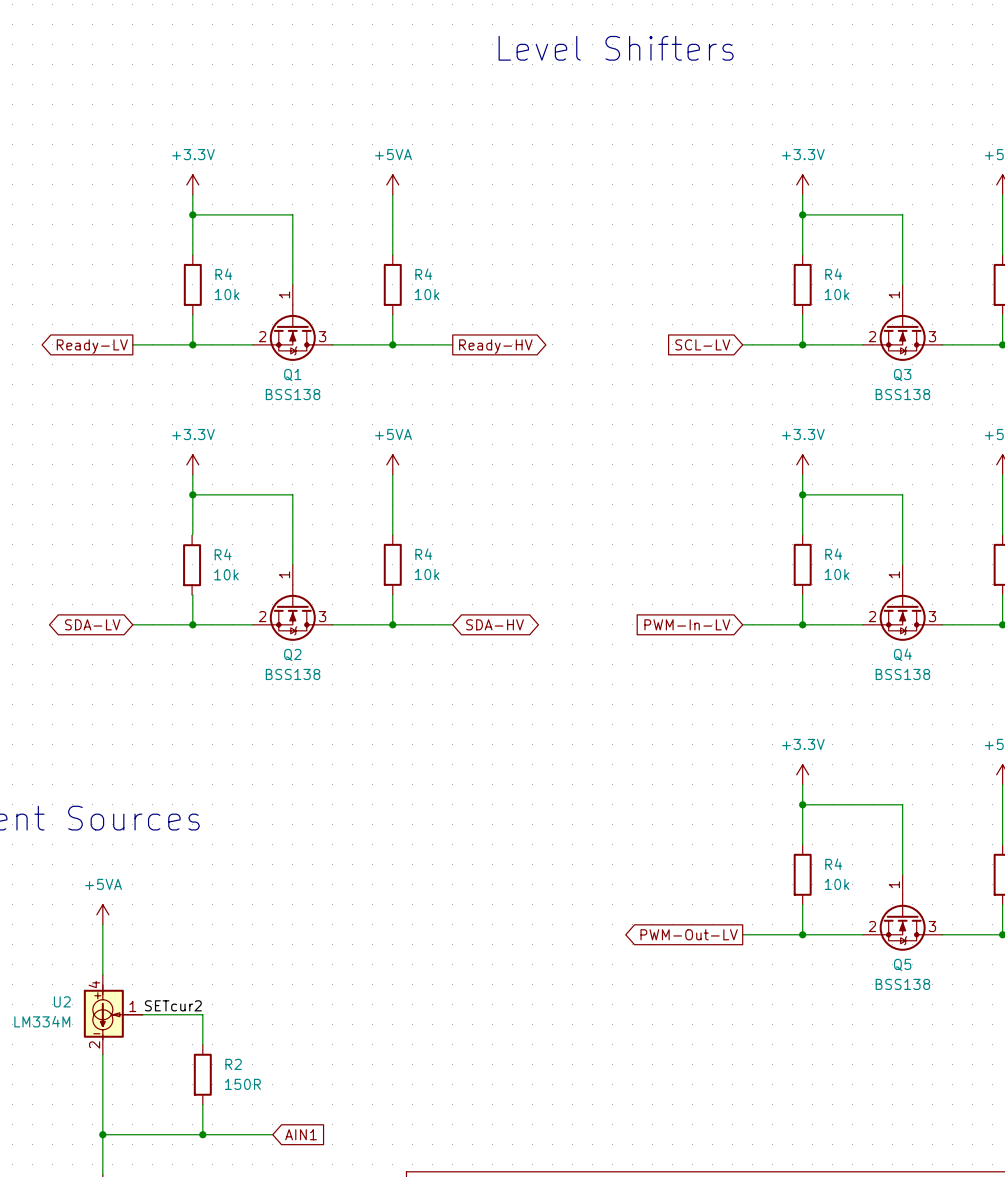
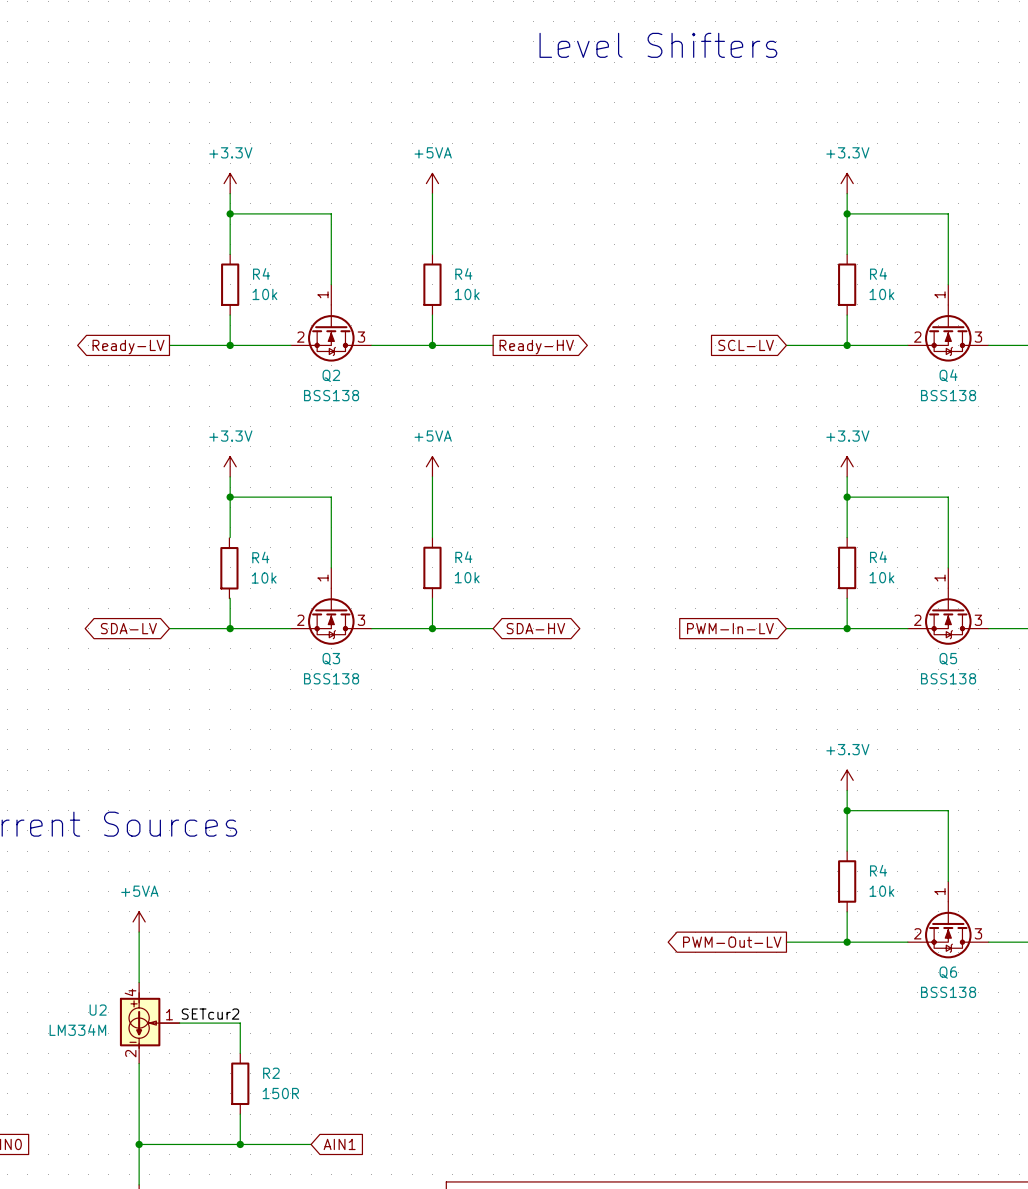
Q1 name: Q1 (292, 375) -> Q2 (331, 375)
Q3 name: Q3 (902, 375) -> Q4 (948, 375)
Q2 name: Q2 (292, 654) -> Q3 (331, 659)
Q4 name: Q4 (902, 654) -> Q5 (948, 659)
Q5 name: Q5 (902, 964) -> Q6 (948, 972)

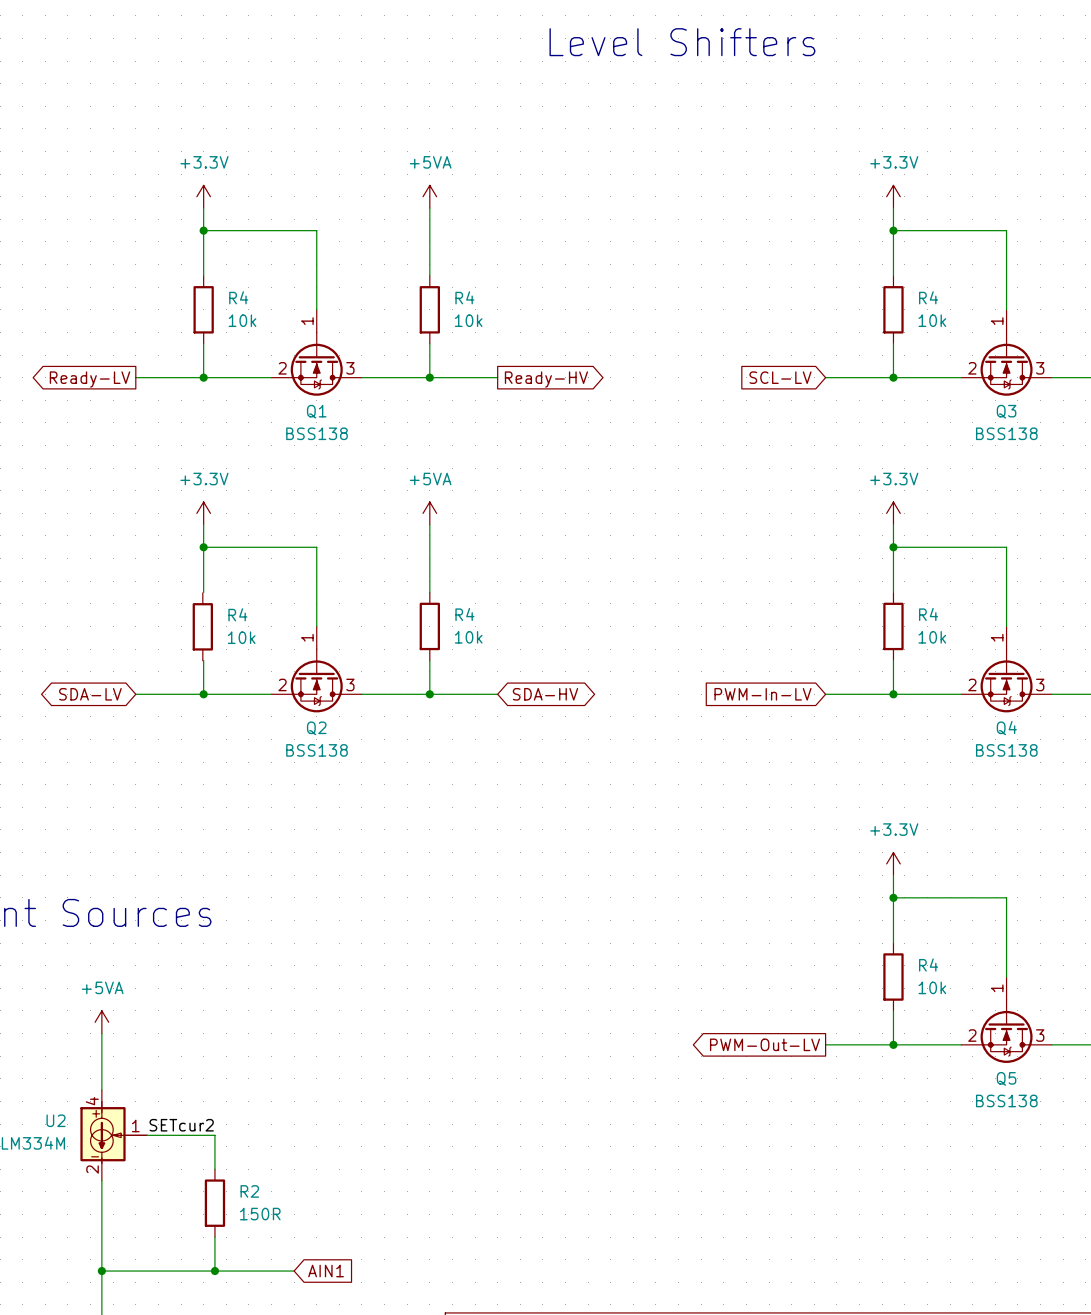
Q2 name: Q2 (331, 375) -> Q1 (316, 411)
Q4 name: Q4 (948, 375) -> Q3 (1006, 411)
Q3 name: Q3 (331, 659) -> Q2 (316, 728)
Q5 name: Q5 (948, 659) -> Q4 (1006, 728)
Q6 name: Q6 (948, 972) -> Q5 (1006, 1078)

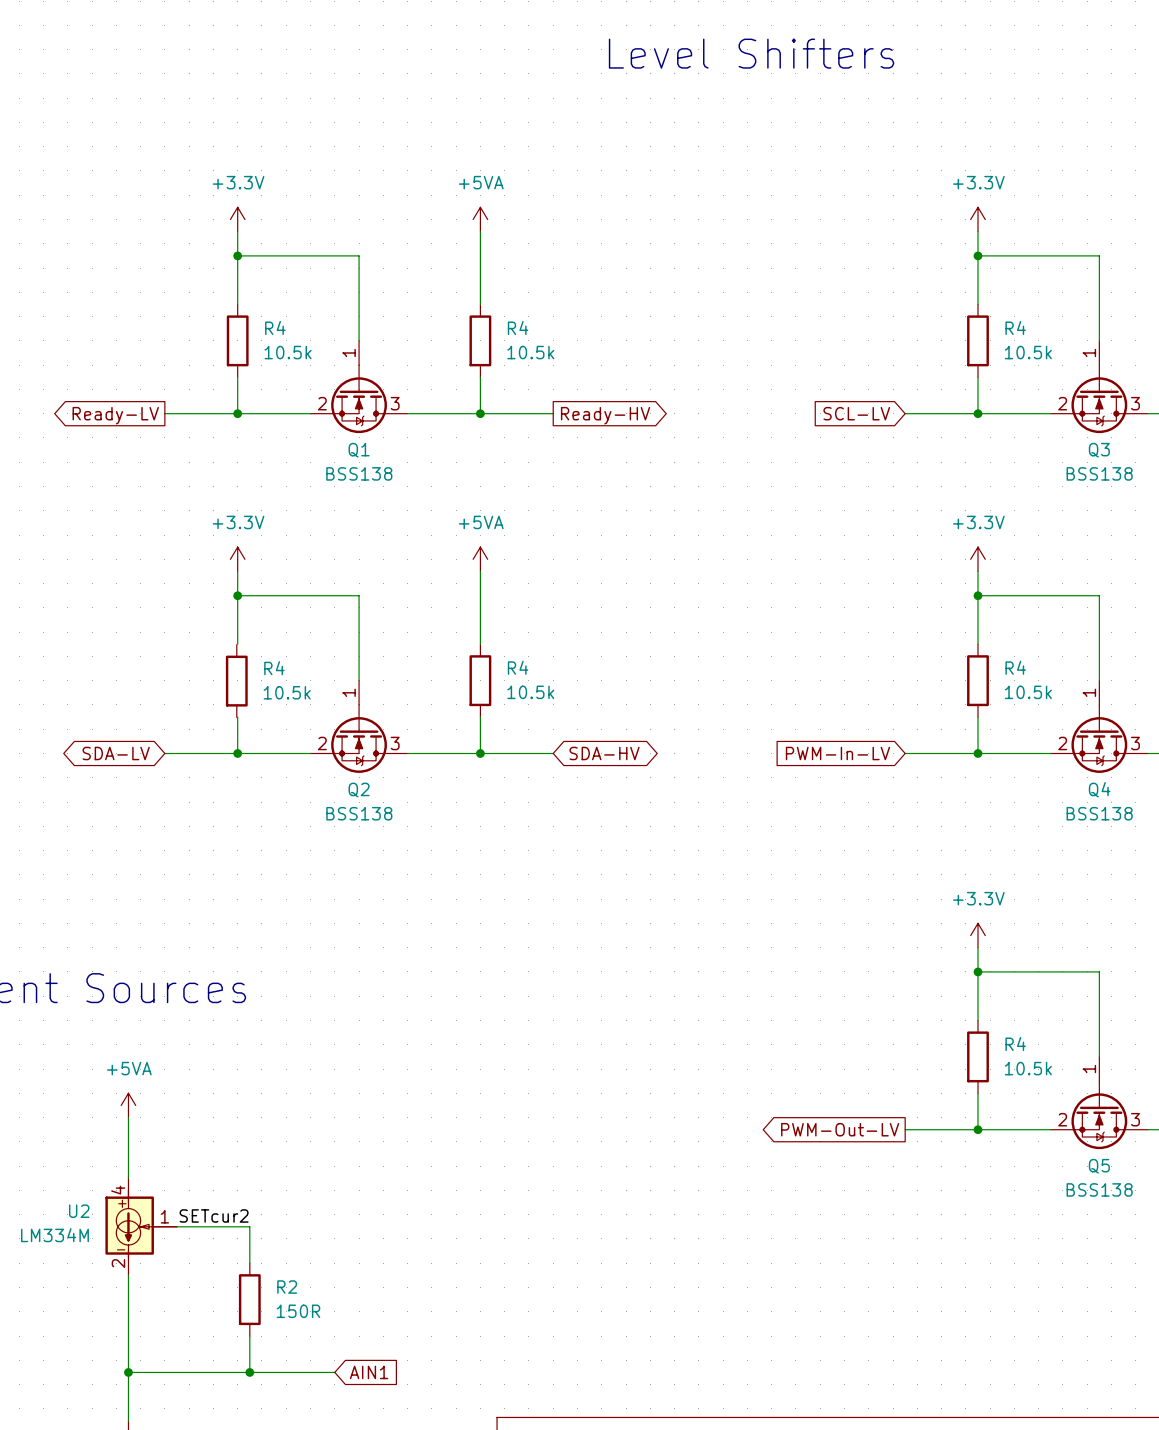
R4 value: 10k (242, 320) -> 10.5k (288, 352)
R4 value: 10k (468, 320) -> 10.5k (530, 352)
R4 value: 10k (932, 320) -> 10.5k (1028, 352)
R4 value: 10k (241, 637) -> 10.5k (287, 692)
R4 value: 10k (468, 637) -> 10.5k (530, 692)
R4 value: 10k (932, 637) -> 10.5k (1028, 692)
R4 value: 10k (932, 987) -> 10.5k (1028, 1068)

